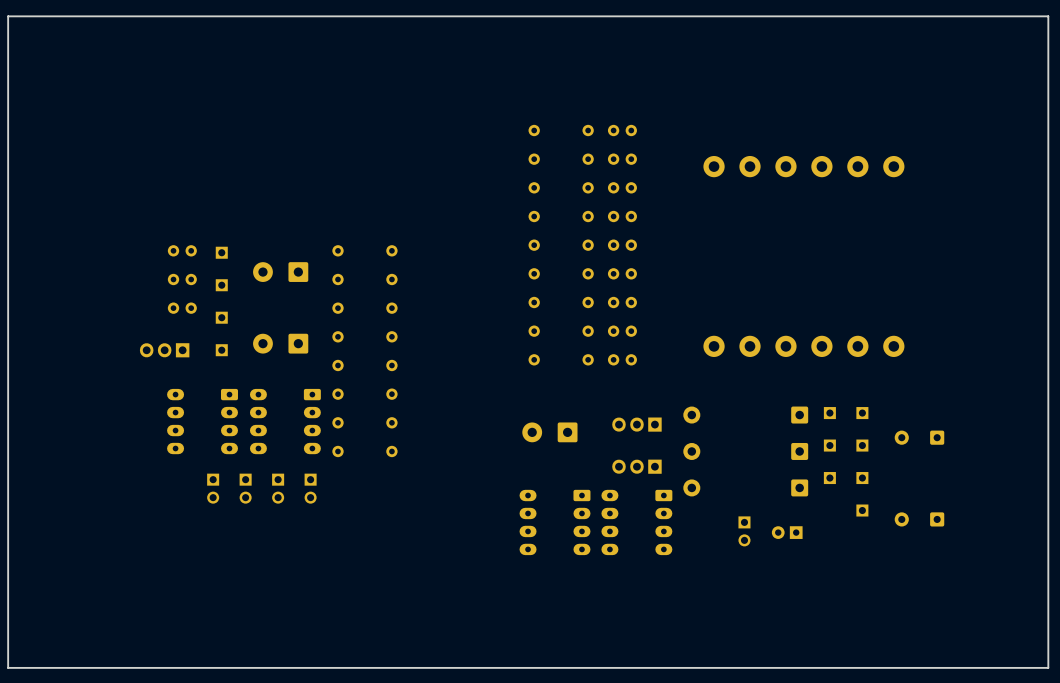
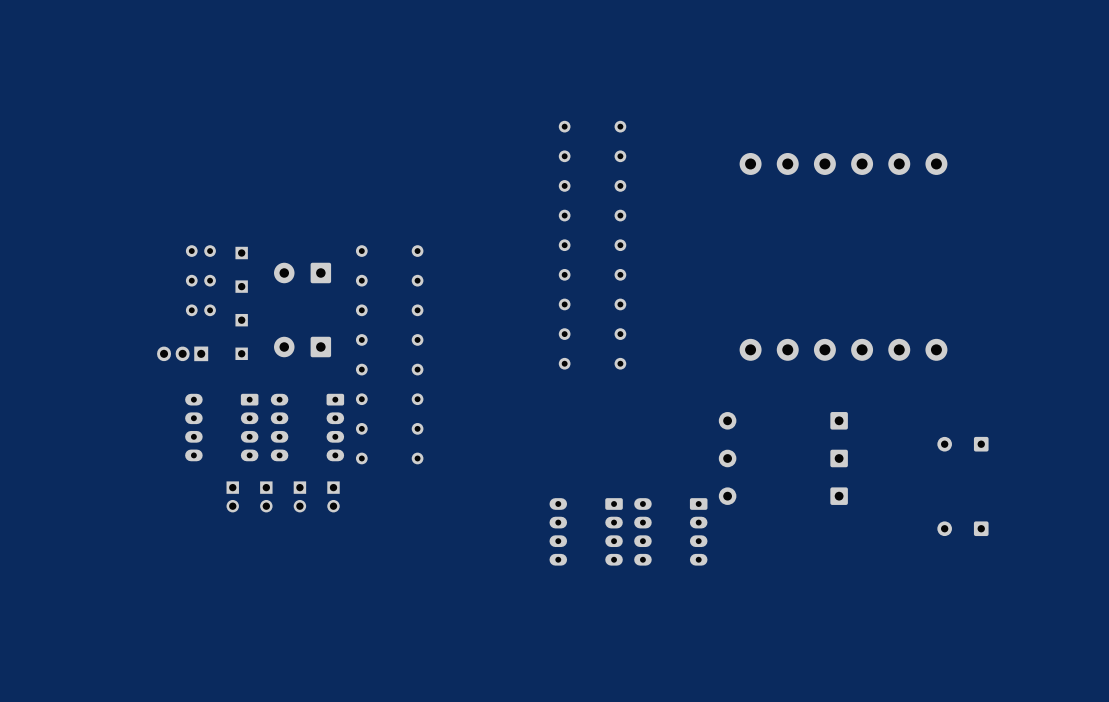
board edge: (1048, 16) (8, 16) (8, 667) (1048, 667) (1048, 16) -> none
part: (622, 130) -> none
part: (622, 159) -> none
part: (622, 187) -> none
part: (622, 216) -> none
part: (622, 245) -> none
part: (622, 273) -> none
part: (622, 302) -> none
part: (622, 331) -> none
part: (622, 359) -> none
part: (829, 413) -> none
part: (862, 413) -> none
part: (636, 424) -> none
part: (549, 432) -> none
part: (829, 445) -> none
part: (862, 445) -> none
part: (636, 466) -> none
part: (829, 478) -> none
part: (862, 478) -> none
part: (862, 510) -> none
part: (744, 531) -> none
part: (787, 532) -> none

